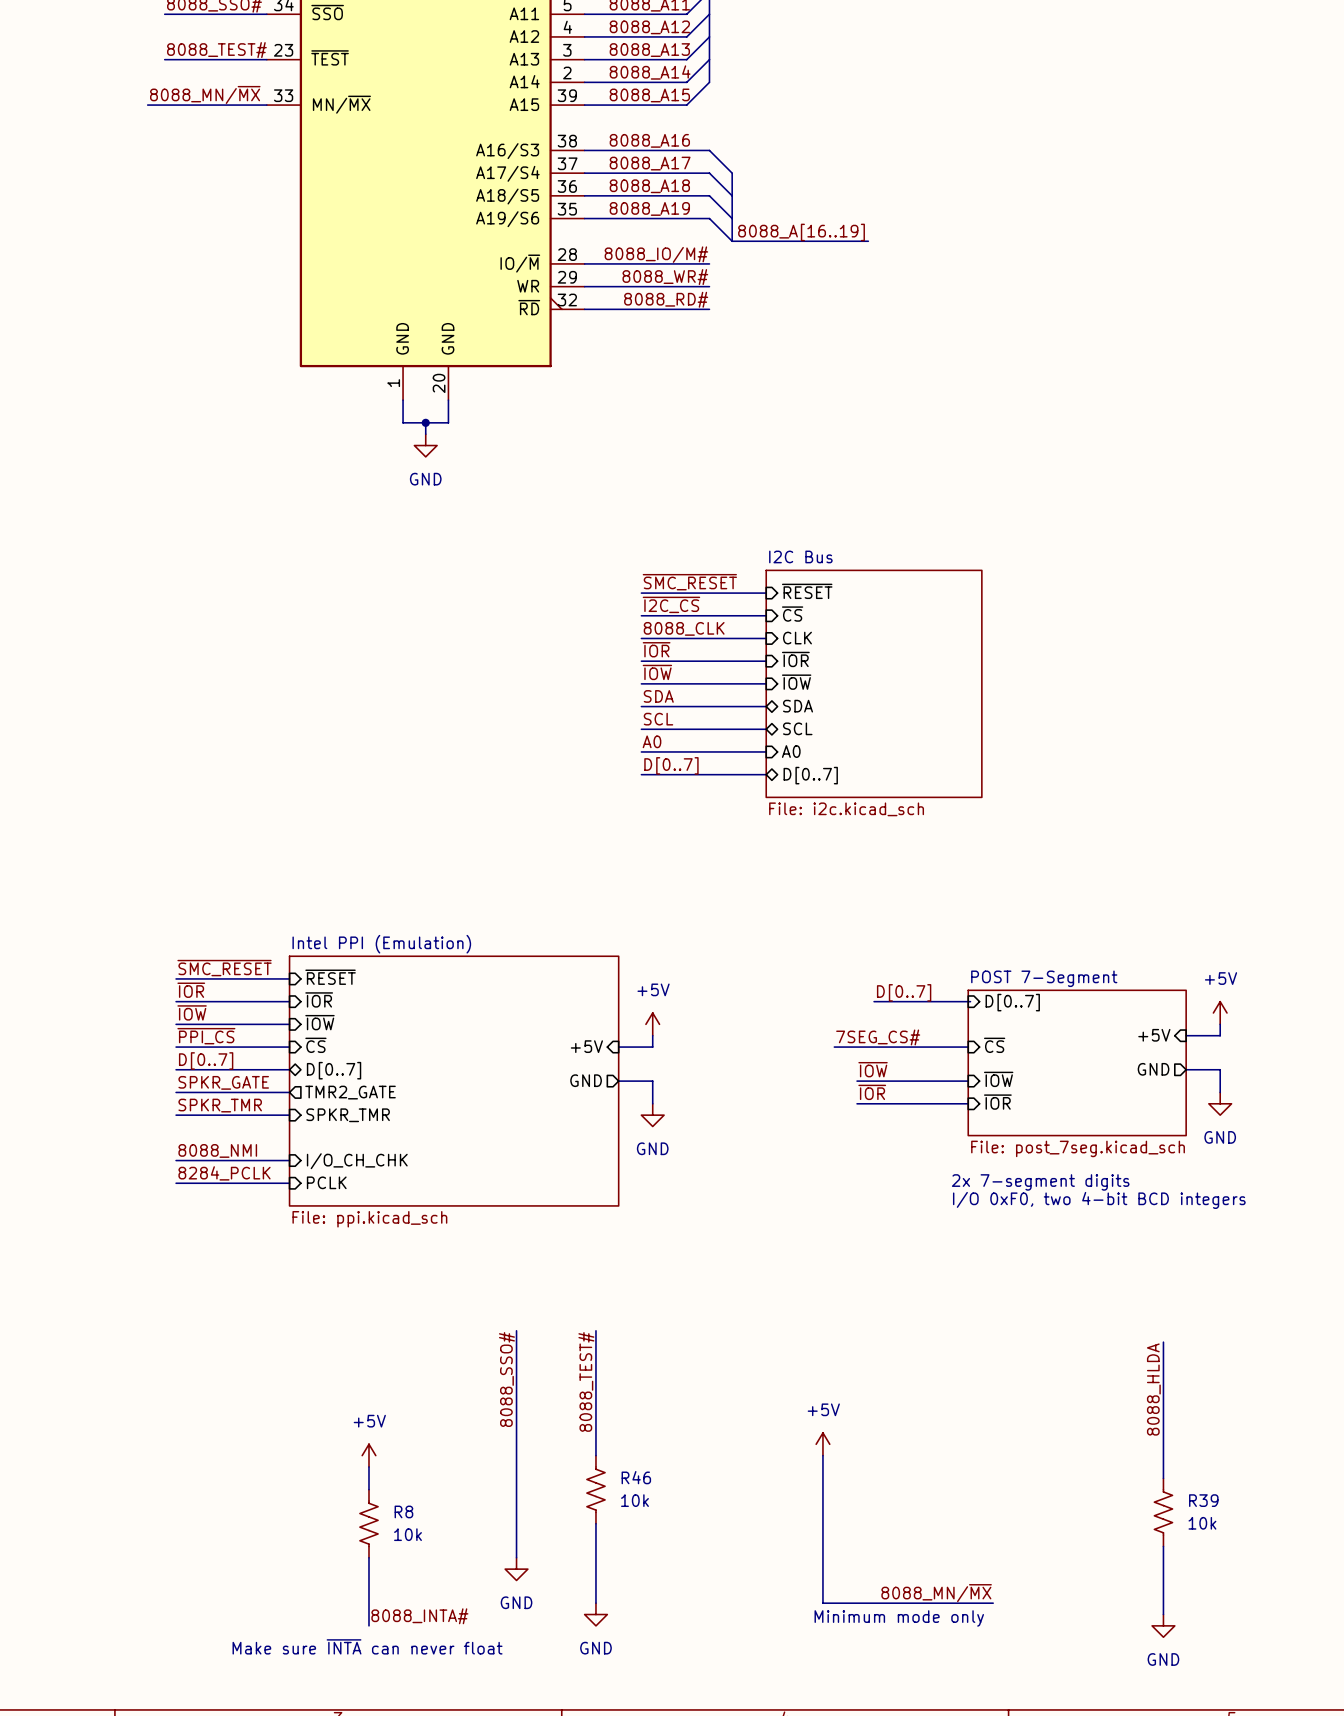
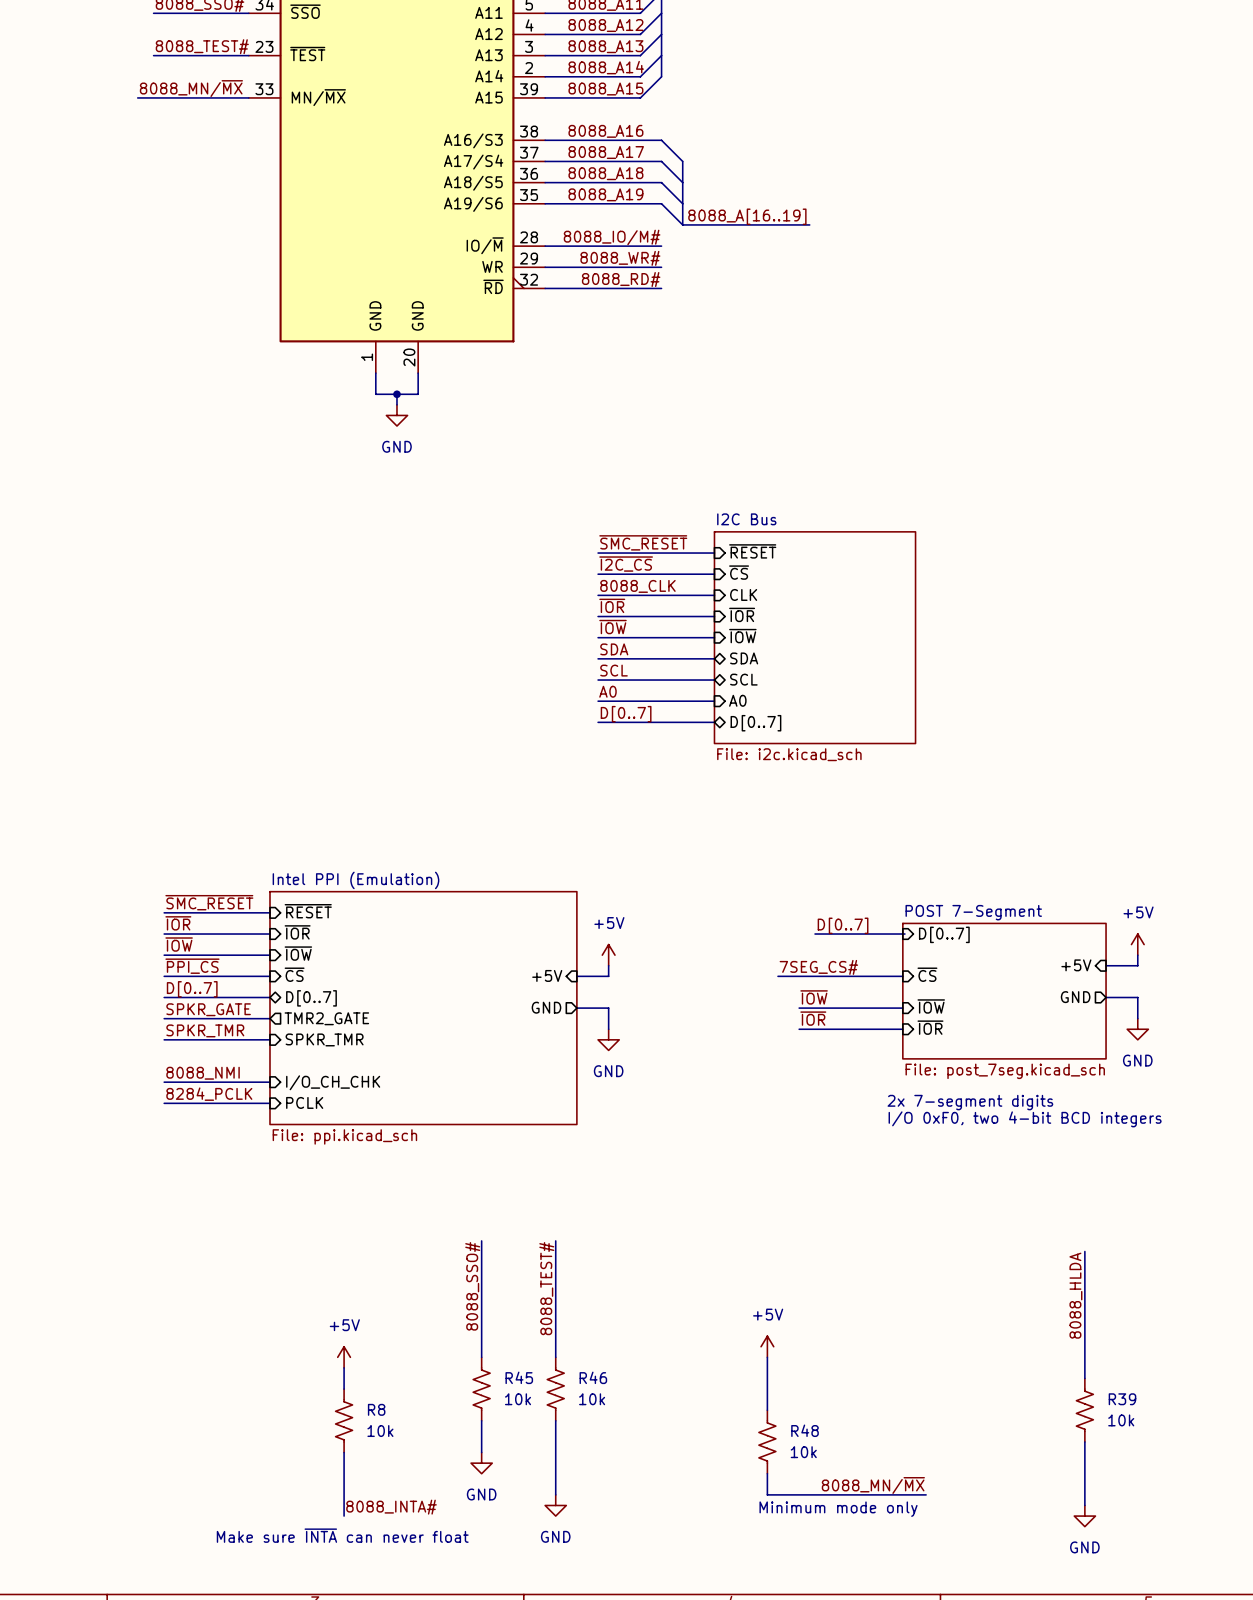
R45: none -> 10k (481, 1389)
R48: none -> 10k (767, 1441)

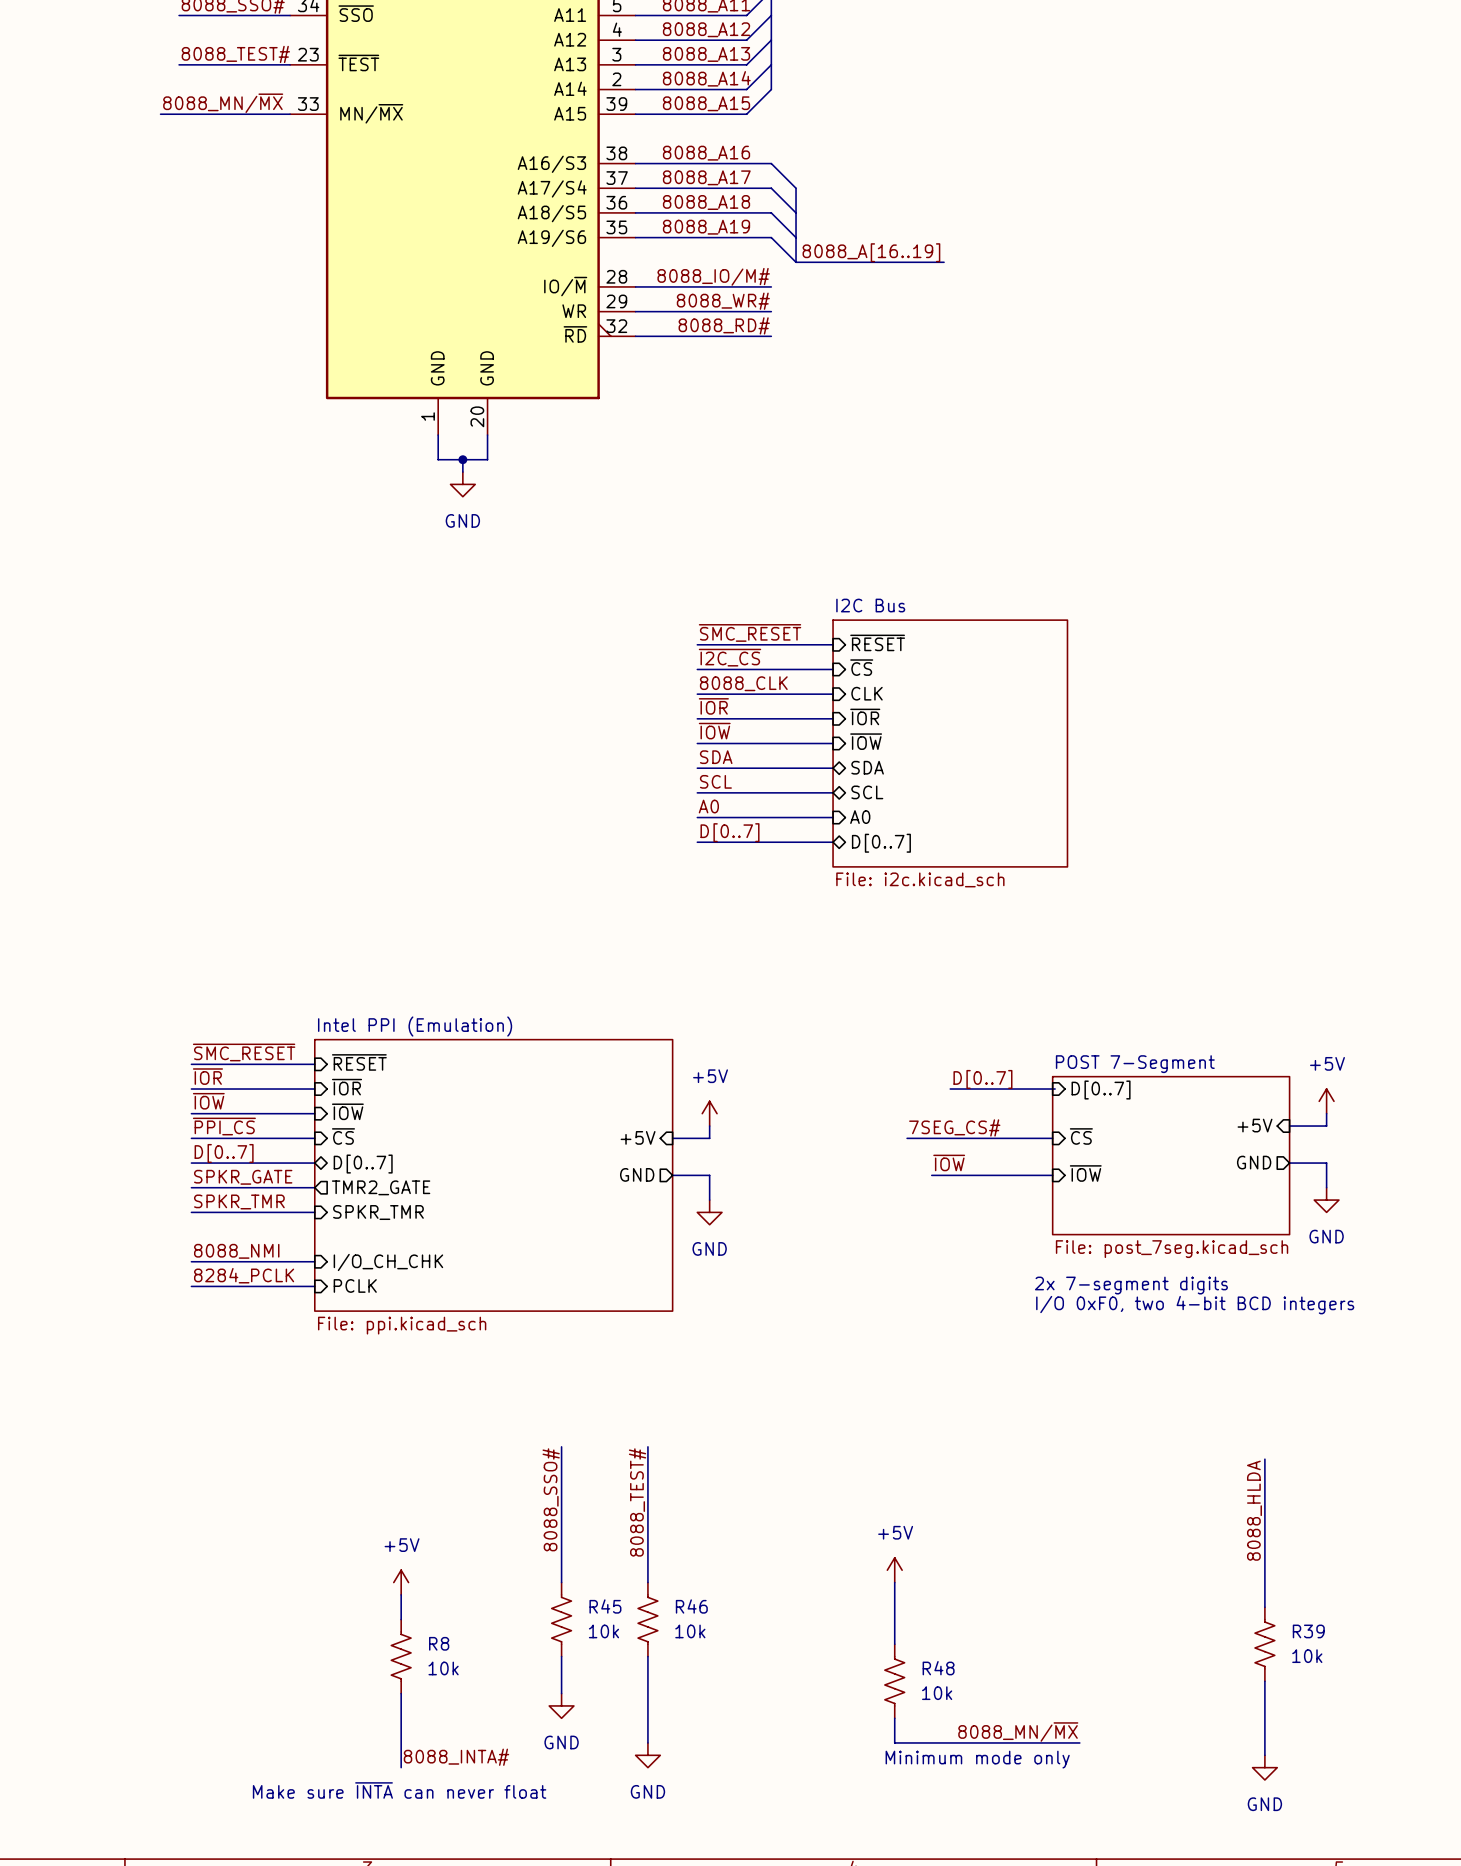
label: ~{IOR} (813, 1018) -> none
sheet pin: ~{IOR} (930, 1027) -> none
wire: (799, 1029) (902, 1029) -> none

